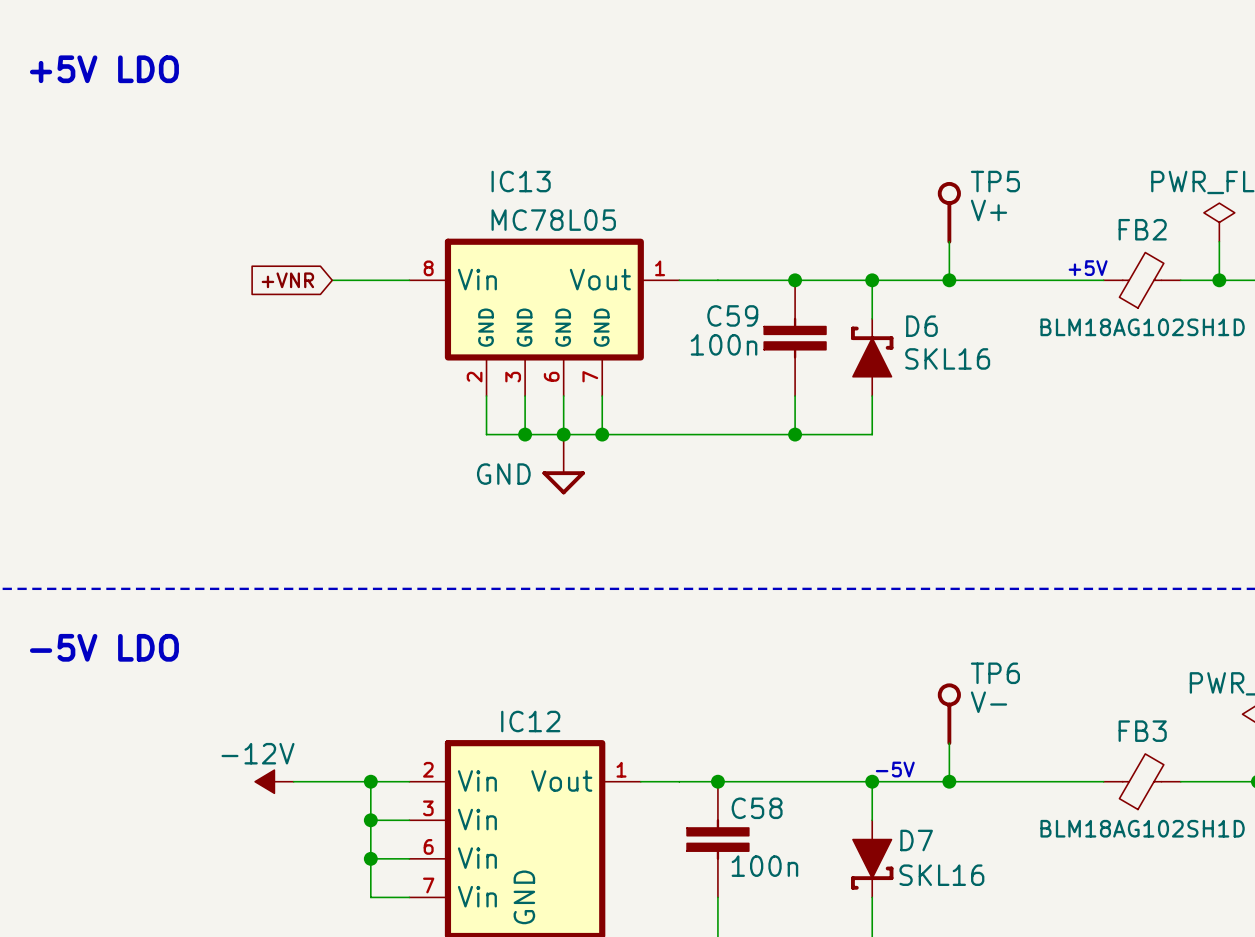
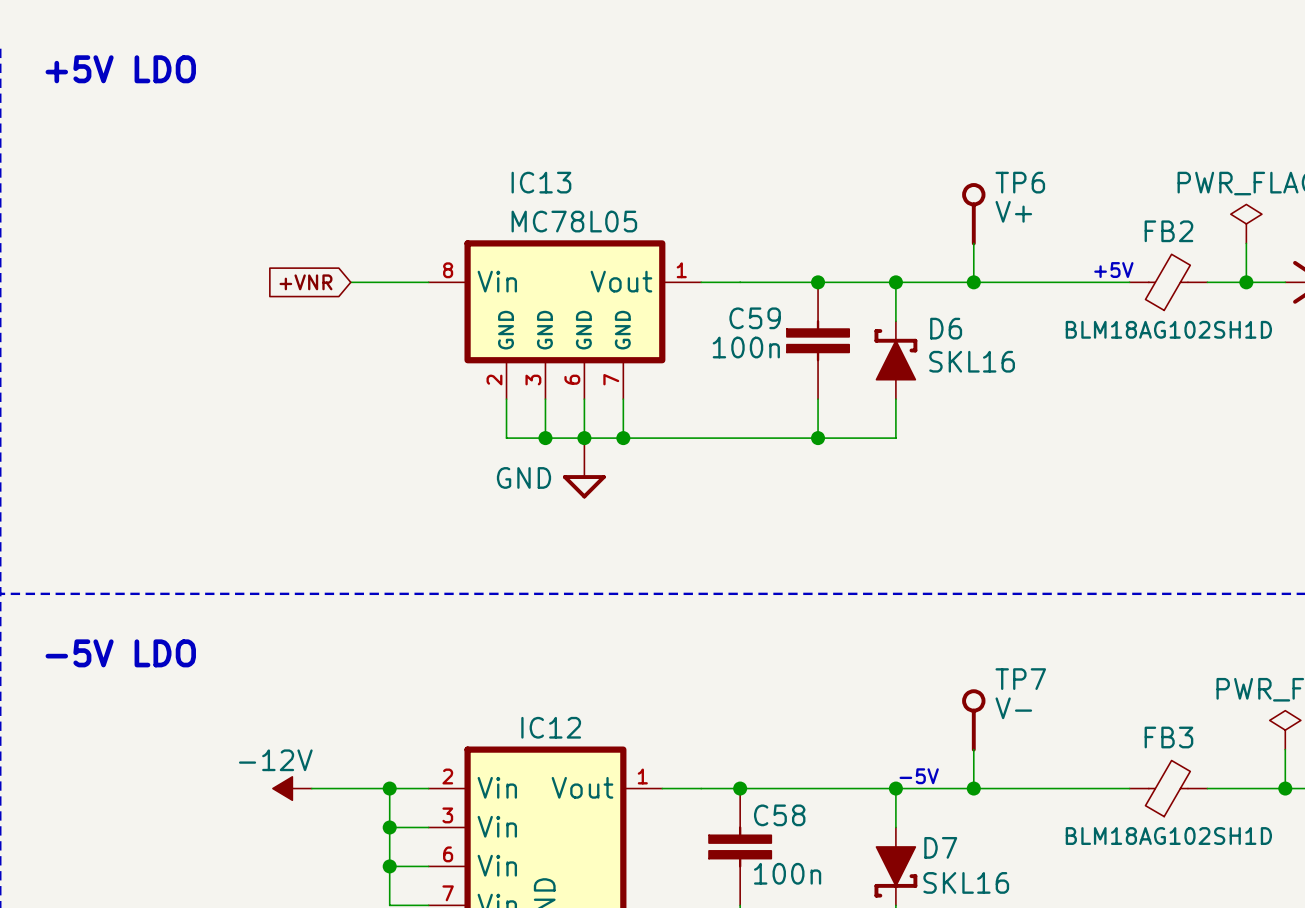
TP5 name: TP5 (995, 181) -> TP6 (1020, 182)
TP6 name: TP6 (995, 673) -> TP7 (1020, 679)

